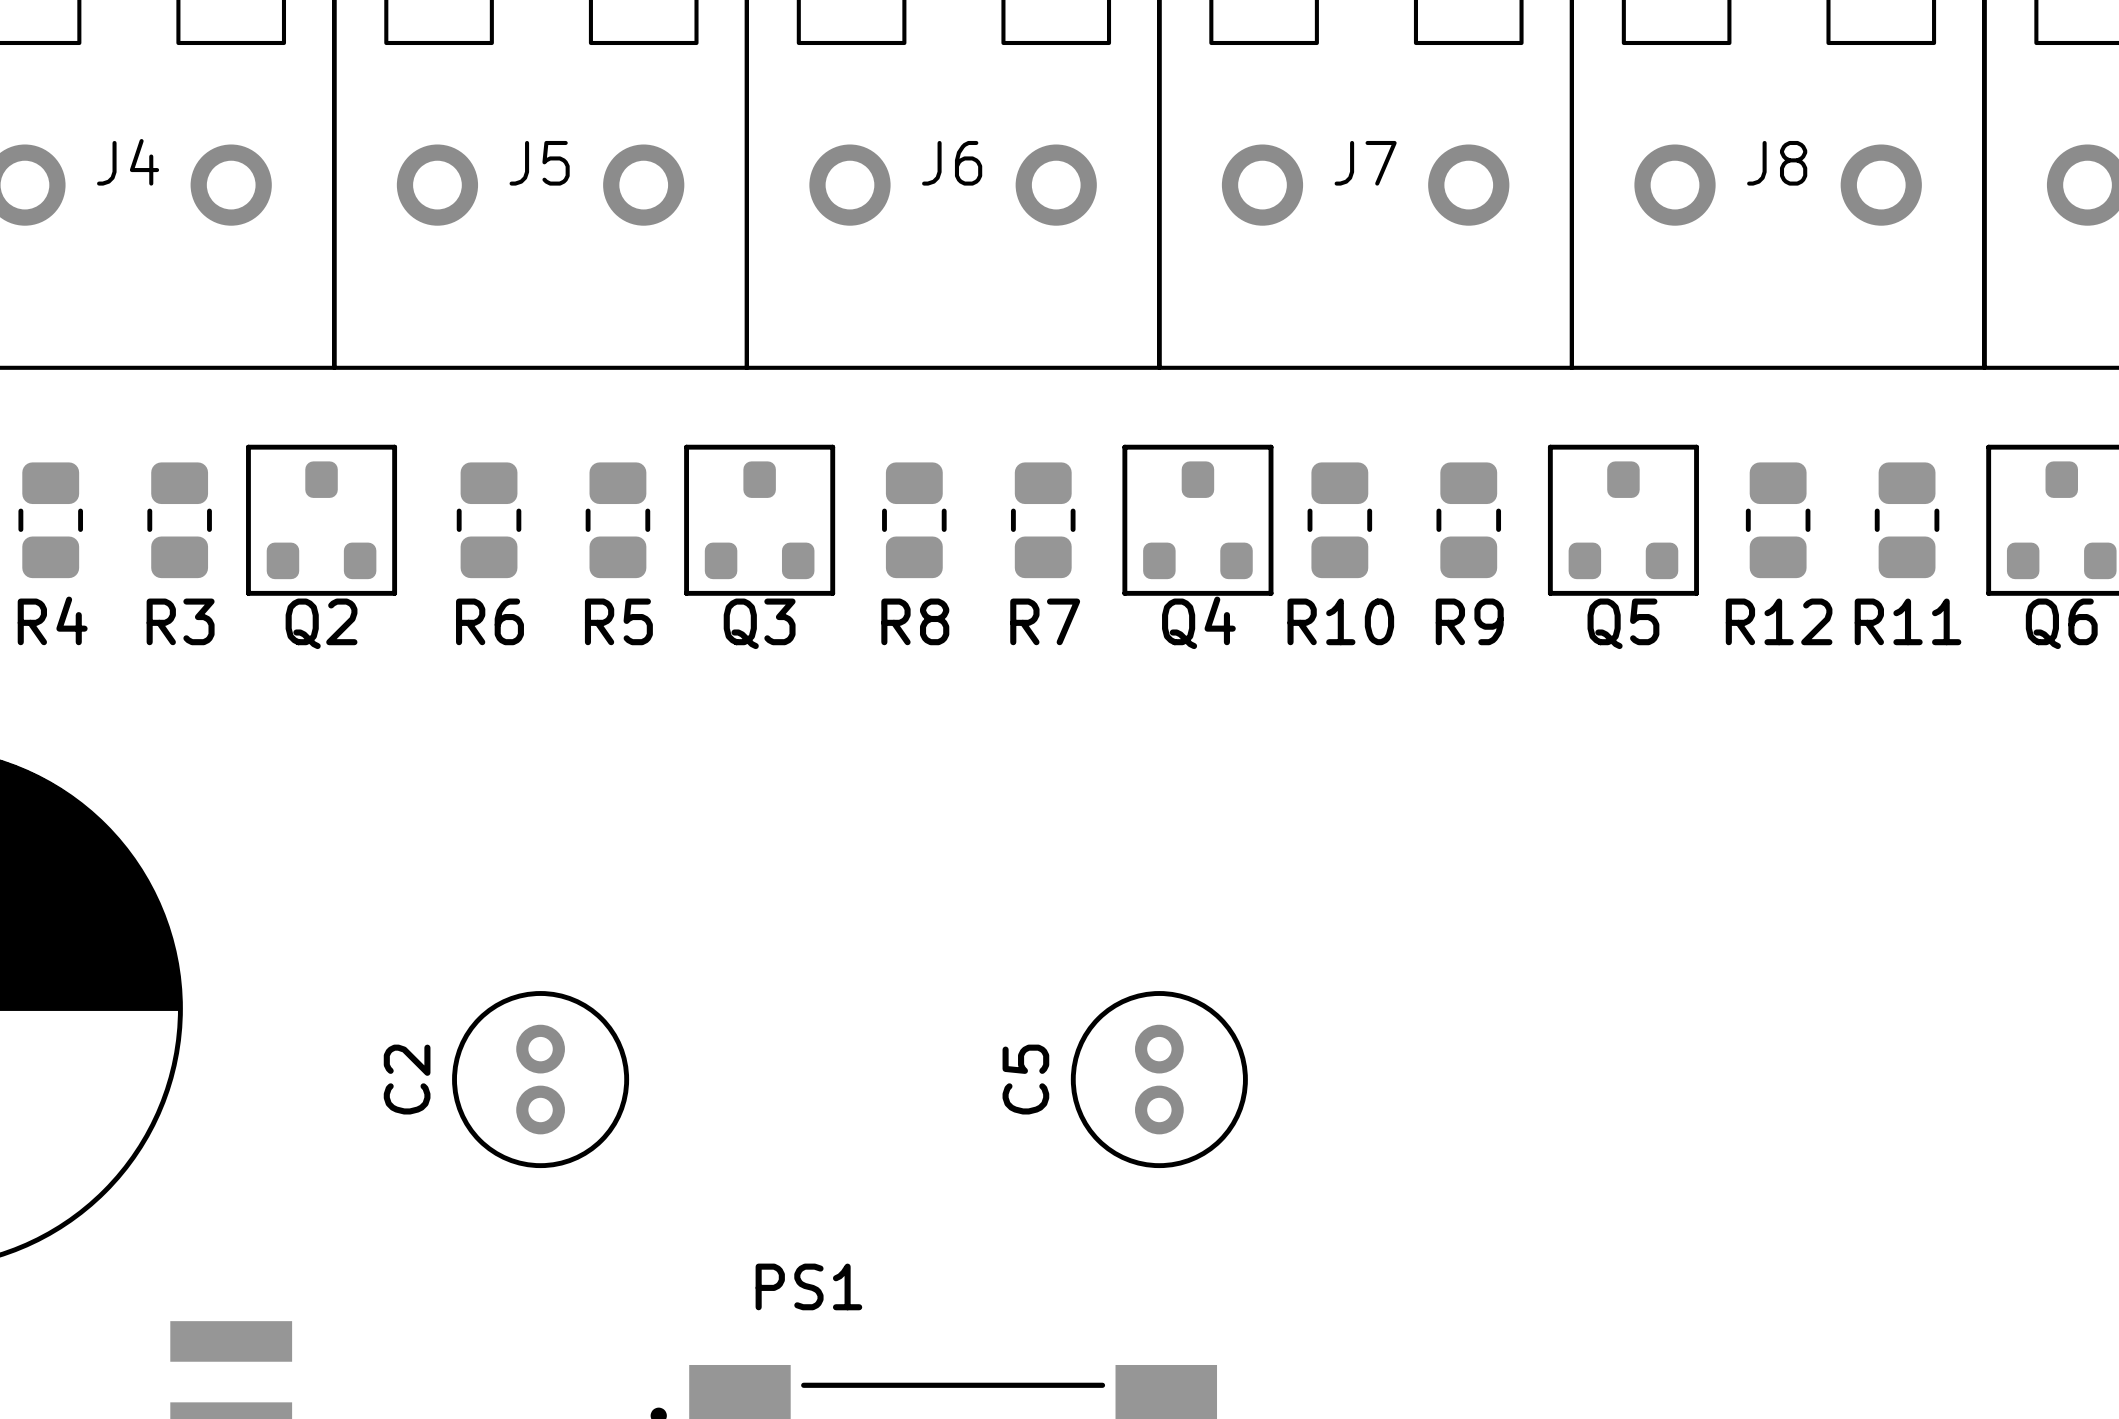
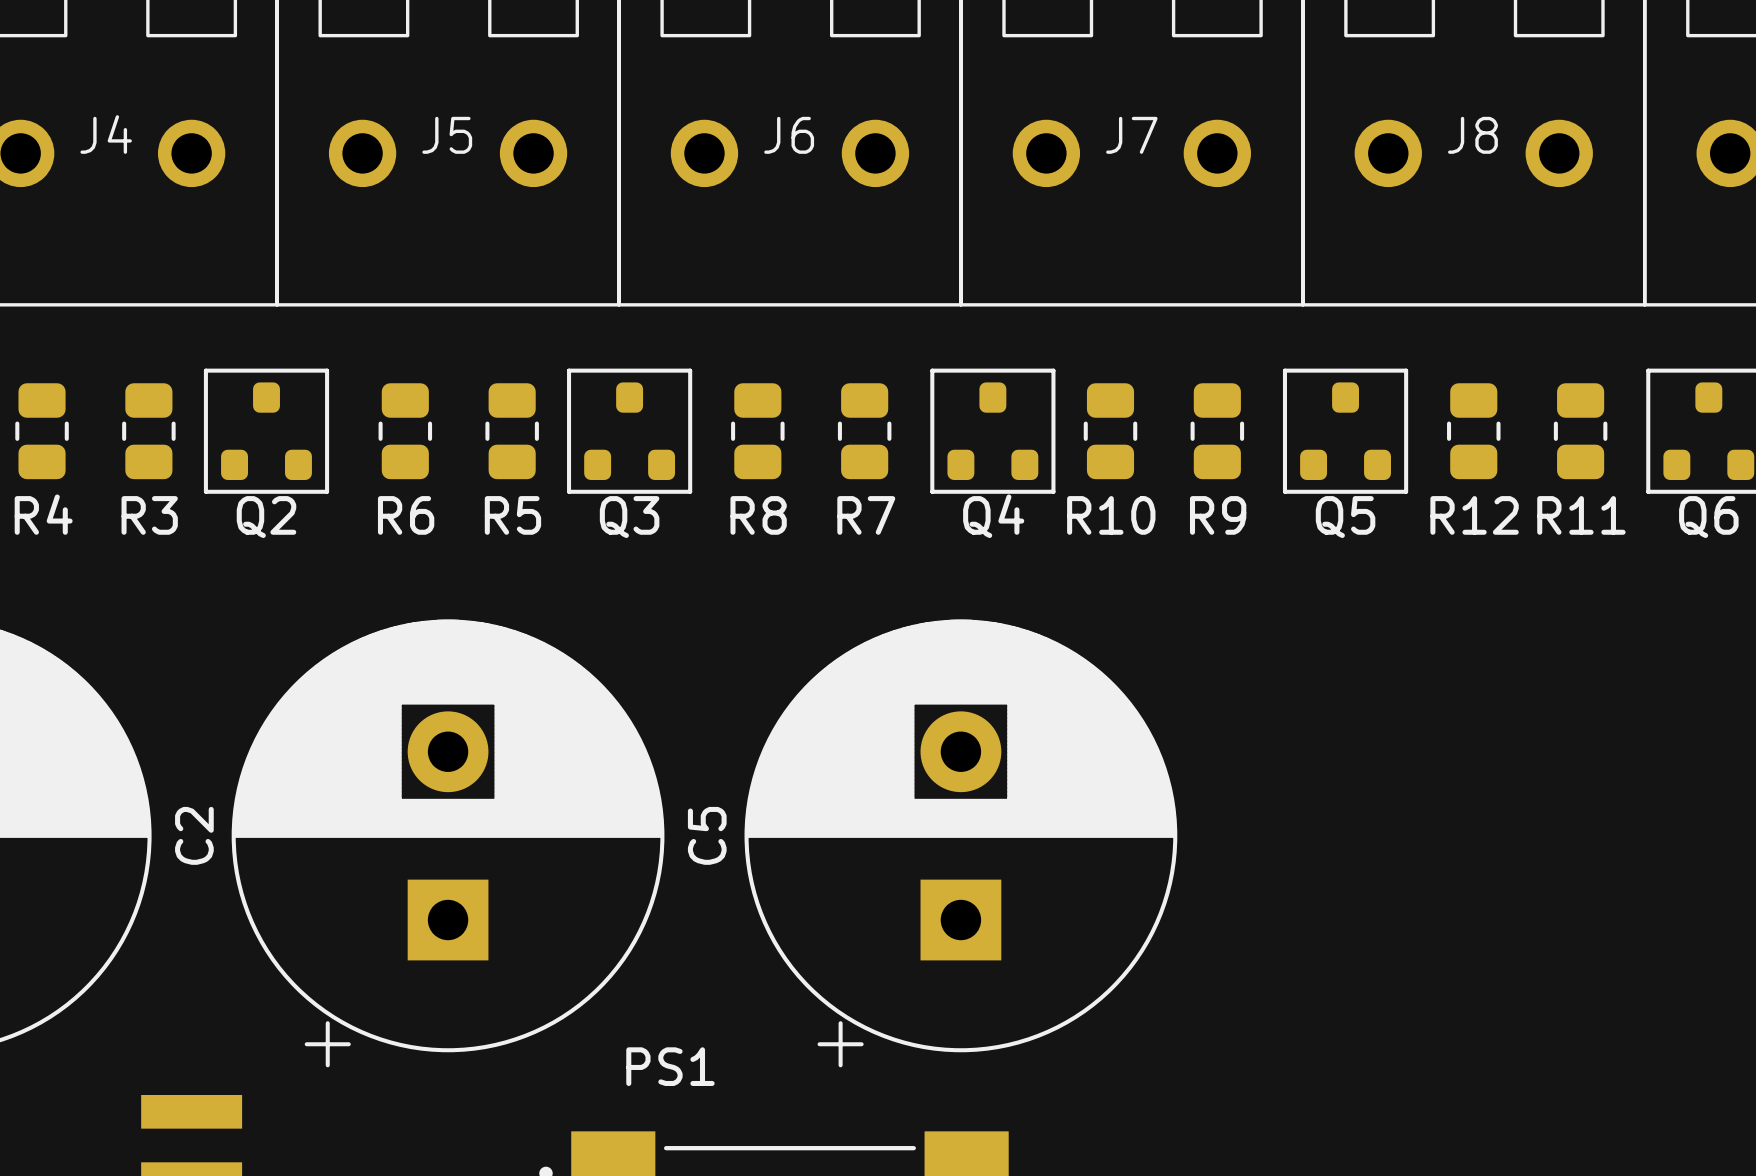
C2 footprint: [452, 991, 630, 1169] -> [231, 619, 665, 1068]
C5 footprint: [1070, 991, 1248, 1169] -> [744, 619, 1178, 1068]
C2 name position: C2 (407, 1079) -> C2 (194, 835)
C5 name position: C5 (1025, 1079) -> C5 (707, 835)

